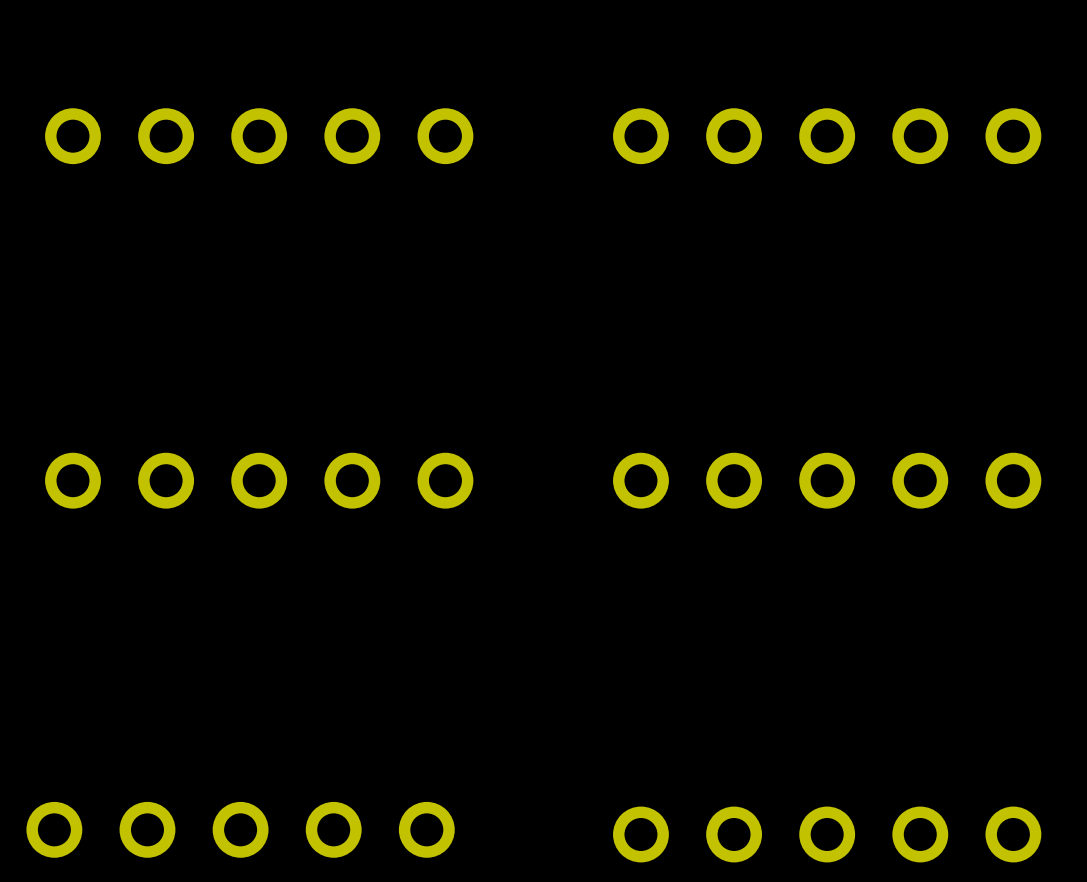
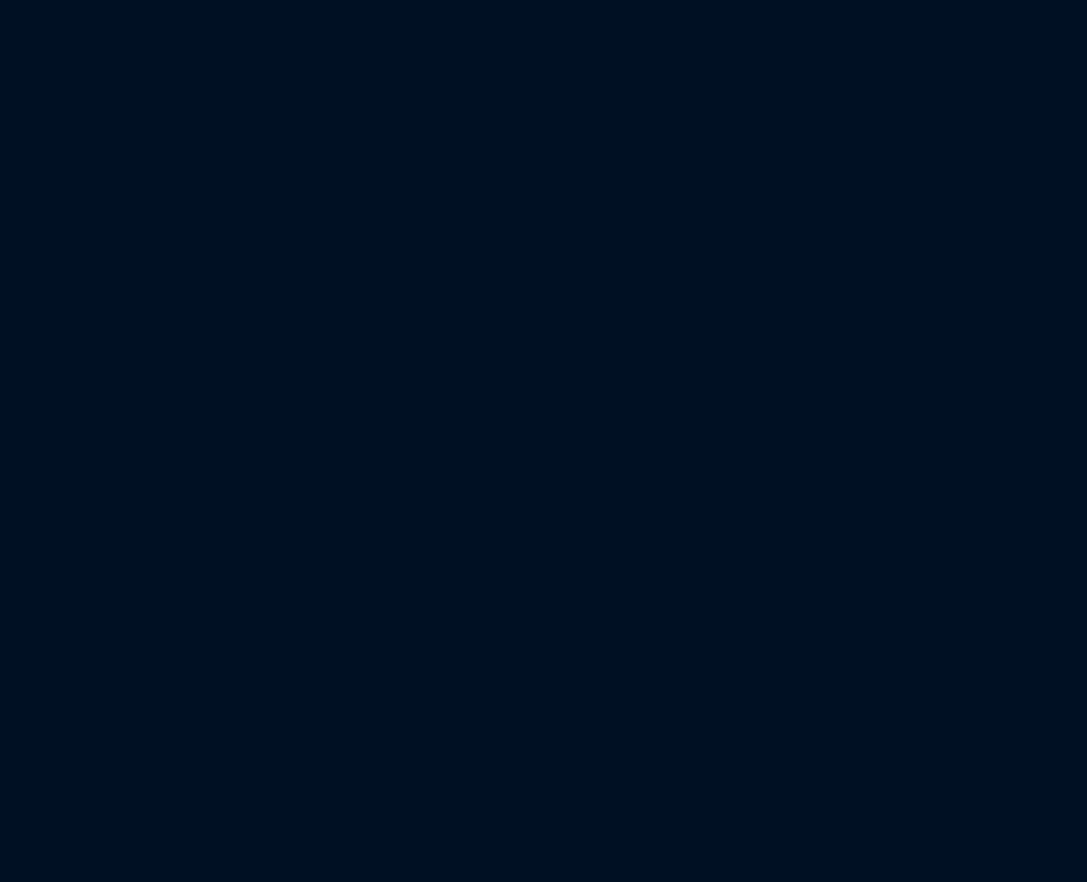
part: (259, 136) -> none
part: (827, 136) -> none
part: (259, 480) -> none
part: (827, 480) -> none
part: (240, 829) -> none
part: (827, 834) -> none

